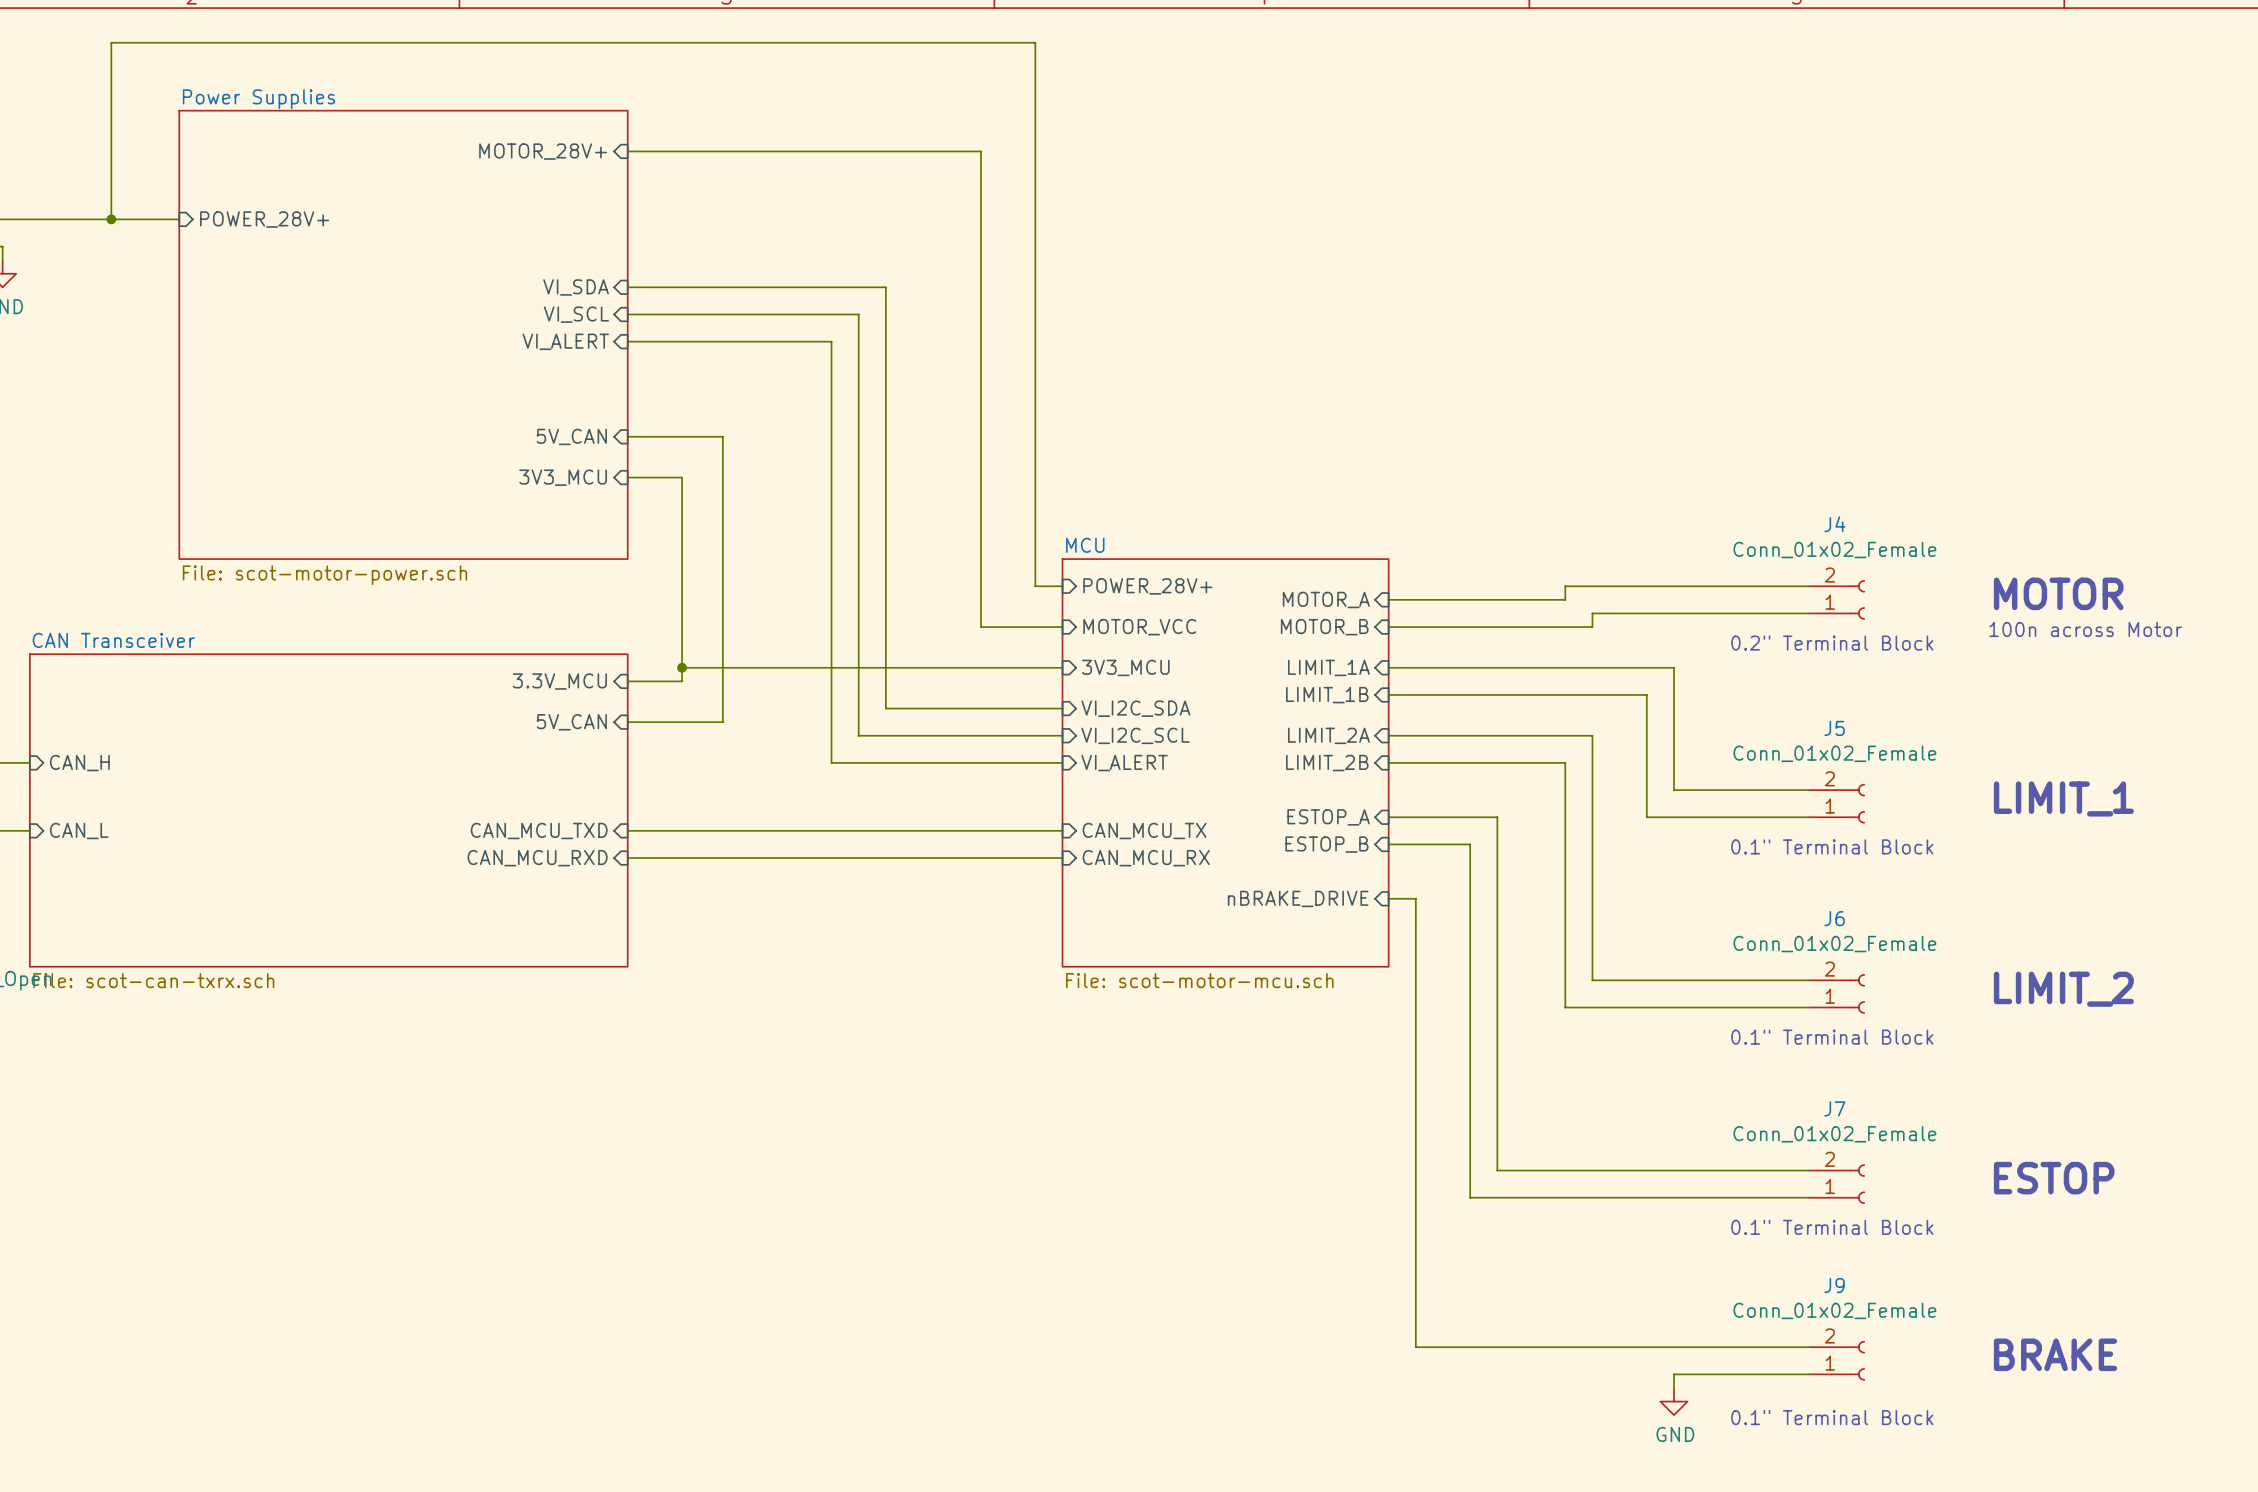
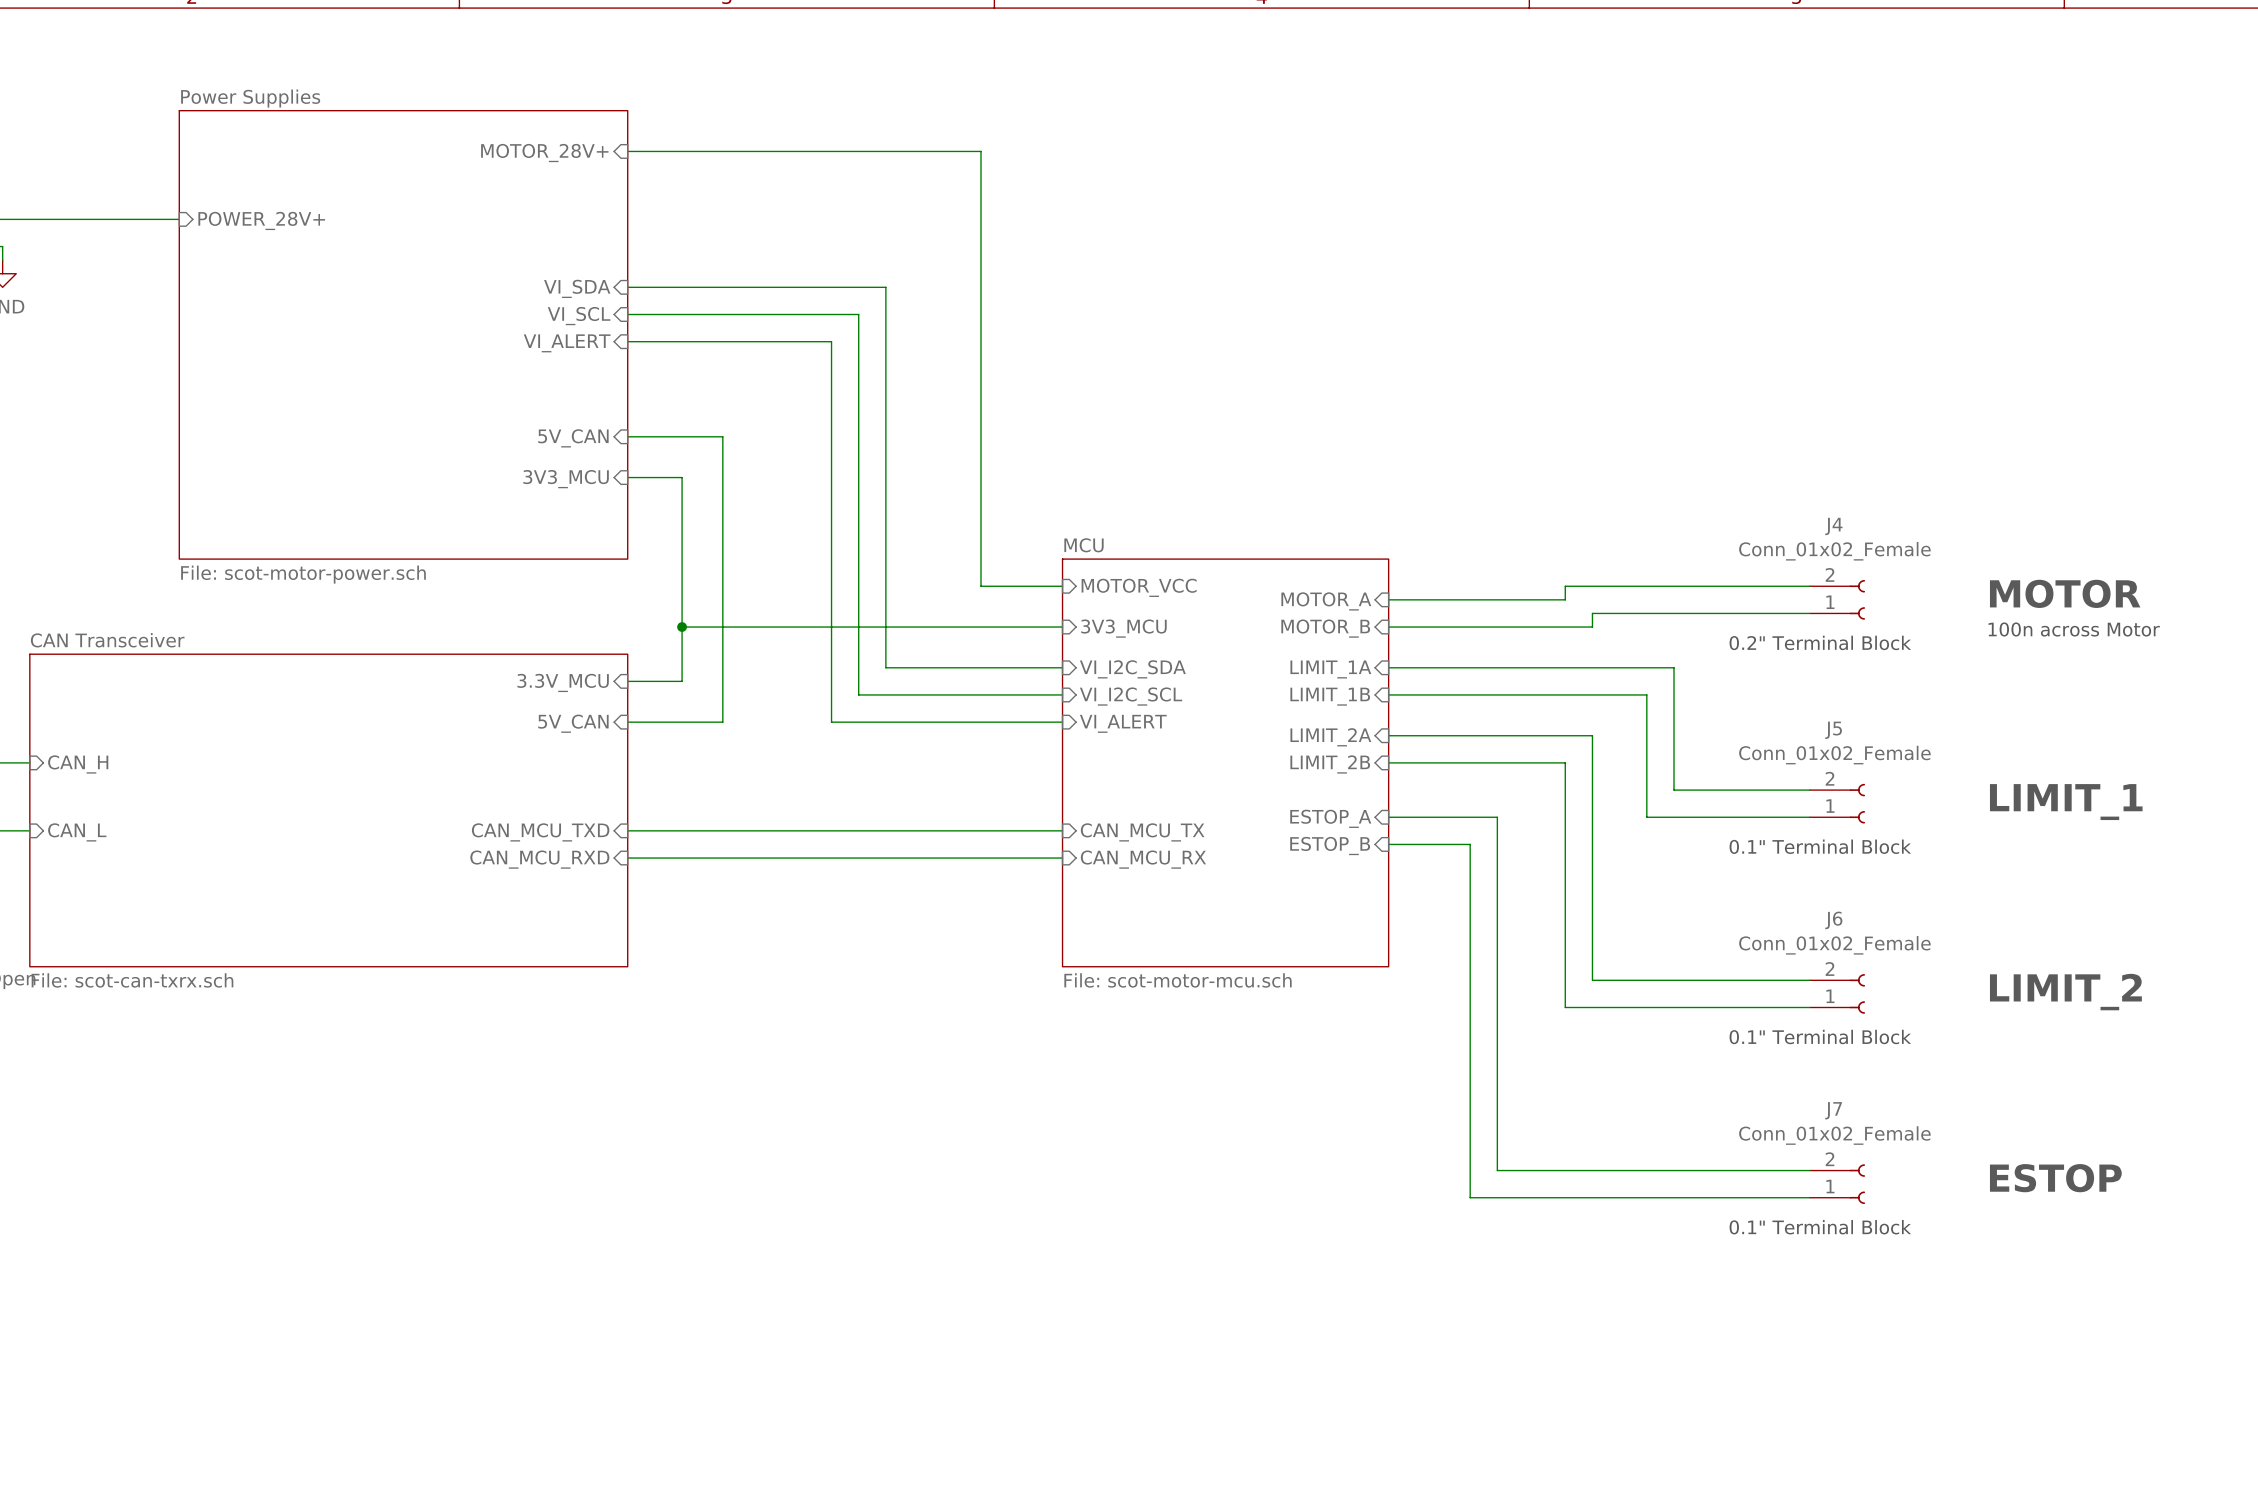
wire: (111, 219) (111, 42) (1035, 42) (1035, 586) -> none
junction: (111, 219) -> none
wire: (981, 586) (981, 627) -> (981, 586) (1035, 586)
sheet pin: POWER_28V+ (1147, 586) -> MOTOR_VCC (1139, 587)
wire: none -> (682, 627) (981, 627)
sheet pin: MOTOR_VCC (1139, 627) -> 3V3_MCU (1123, 628)
wire: (682, 667) (885, 667) (885, 708) (1062, 708) -> none
junction position: (682, 667) -> (682, 627)
sheet pin: 3V3_MCU (1125, 667) -> VI_I2C_SDA (1132, 669)
wire: (858, 694) (858, 735) (1062, 735) -> (858, 694) (1062, 694)
sheet pin: VI_I2C_SDA (1135, 708) -> none
wire: (831, 722) (831, 762) (1062, 762) -> (831, 722) (1062, 722)
sheet pin position: VI_I2C_SCL (1135, 735) -> VI_I2C_SCL (1131, 696)
sheet pin position: VI_ALERT (1124, 763) -> VI_ALERT (1123, 723)
sheet pin: nBRAKE_DRIVE (1298, 898) -> none
wire: (1388, 898) (1415, 898) (1415, 1347) (1809, 1347) -> none
text: BRAKE (2055, 1354) -> none
J9: Conn_01x02_Female (1837, 1360) -> none
wire: (1809, 1374) (1673, 1374) (1673, 1387) -> none
power symbol: GND (1673, 1401) -> none
text: 0.1" Terminal Block (1832, 1417) -> none

